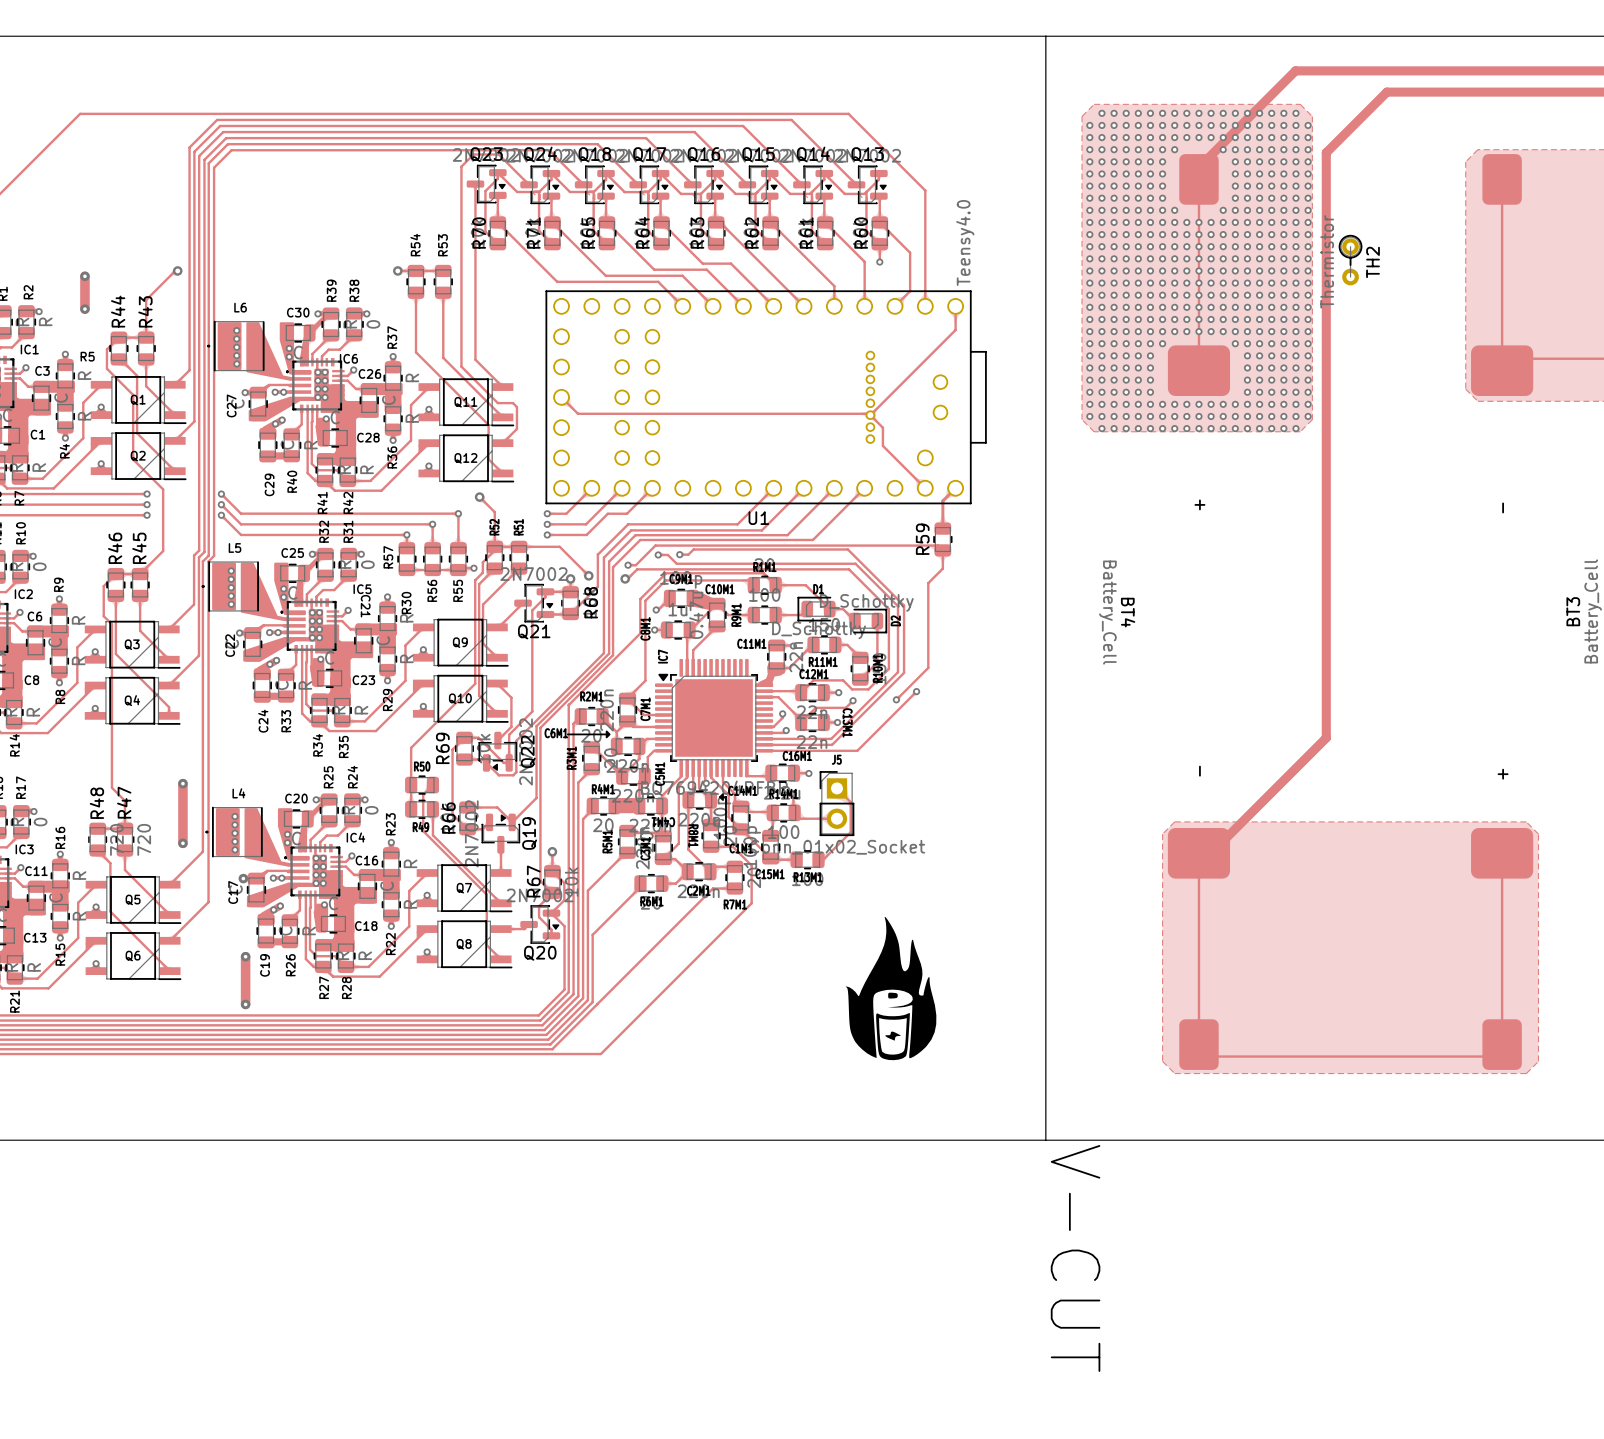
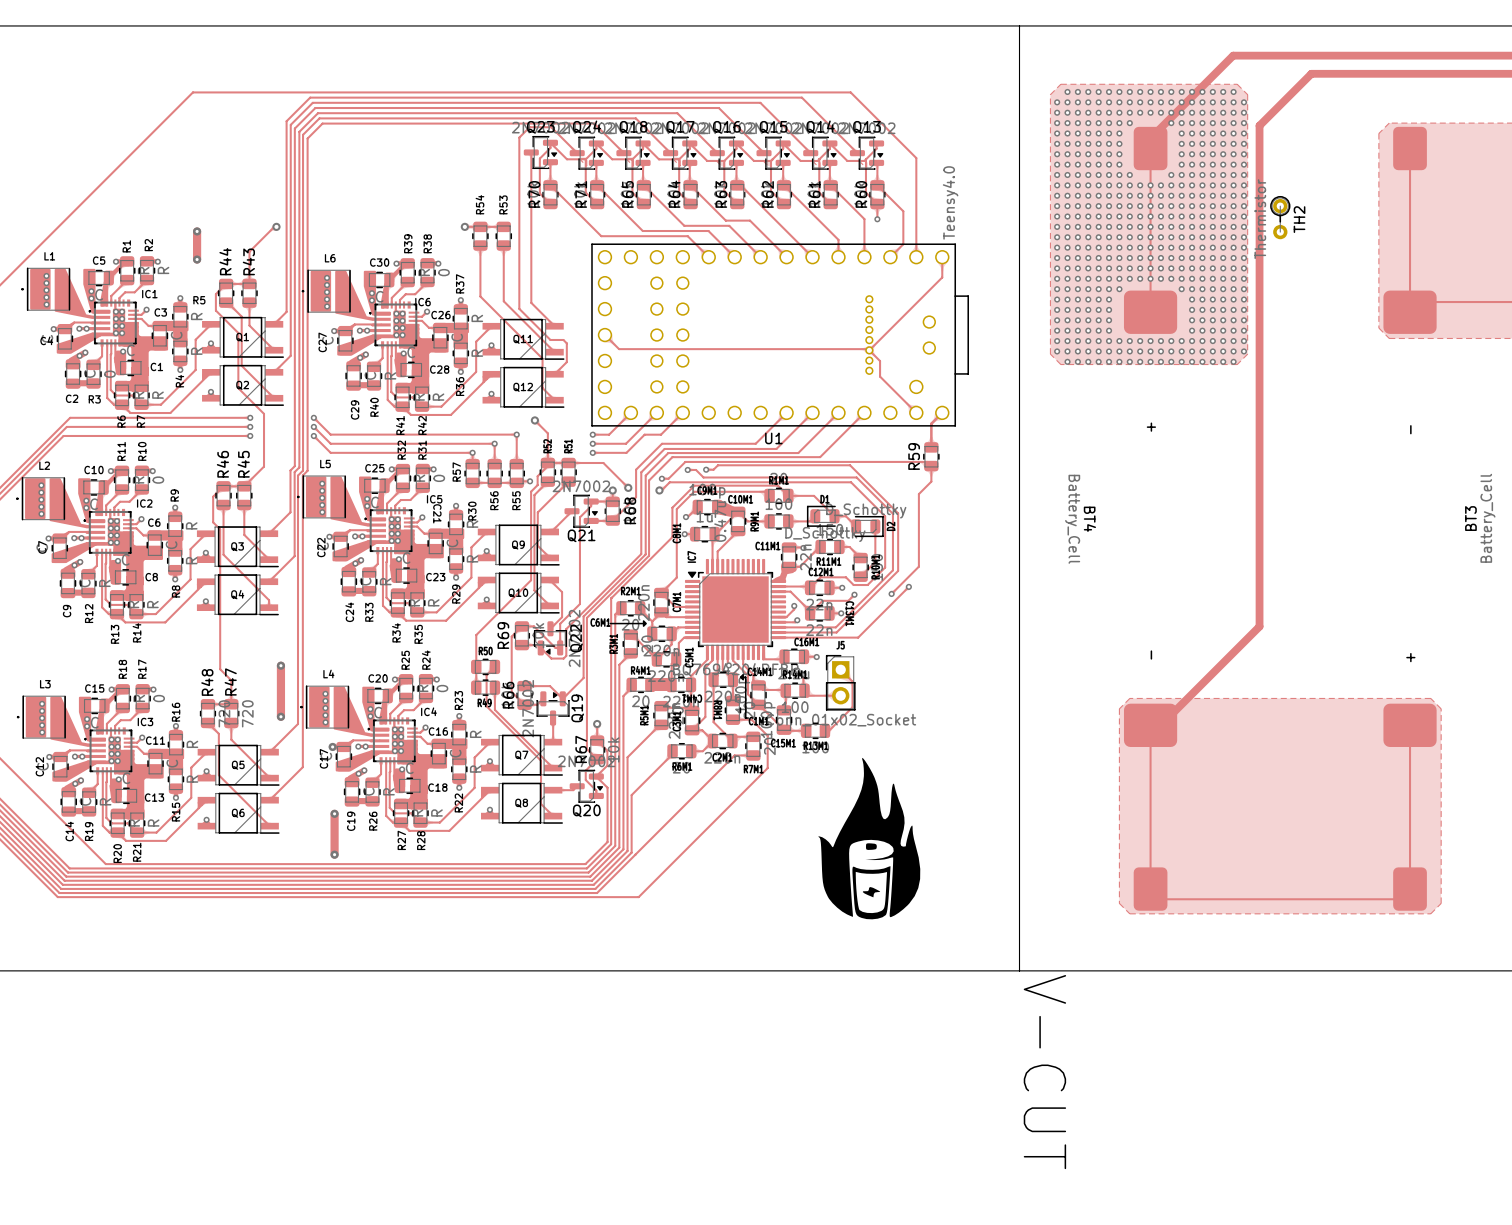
drawing: none -> [818, 757, 921, 920]
drawing: [845, 916, 937, 1061] -> none

